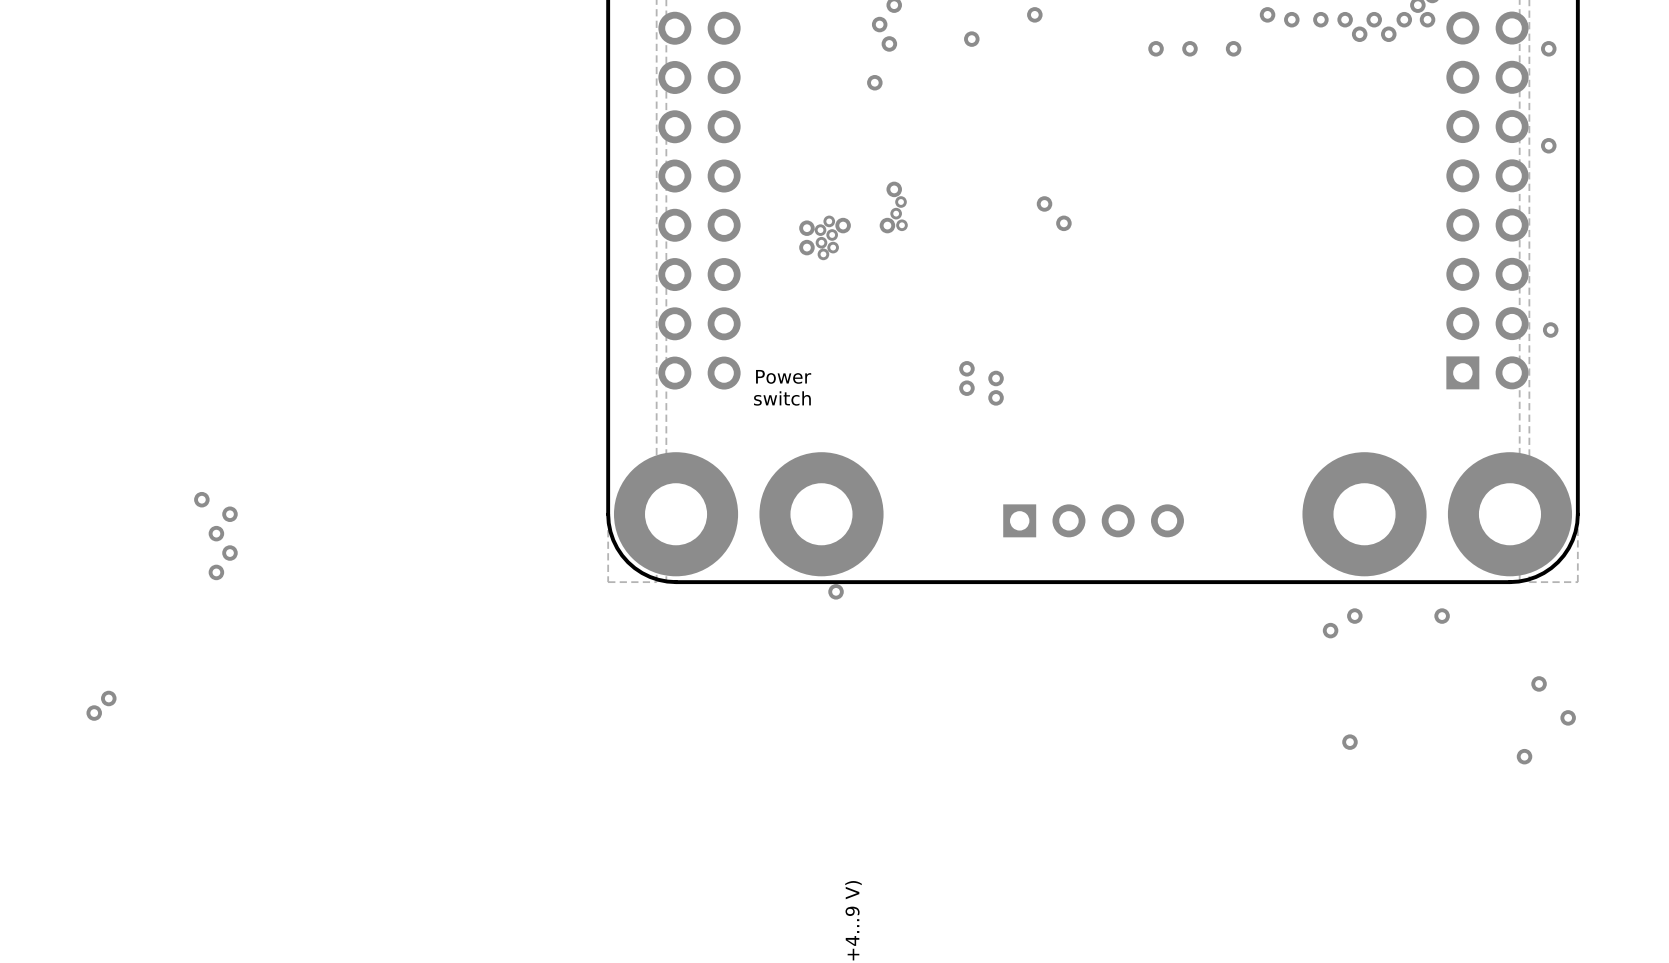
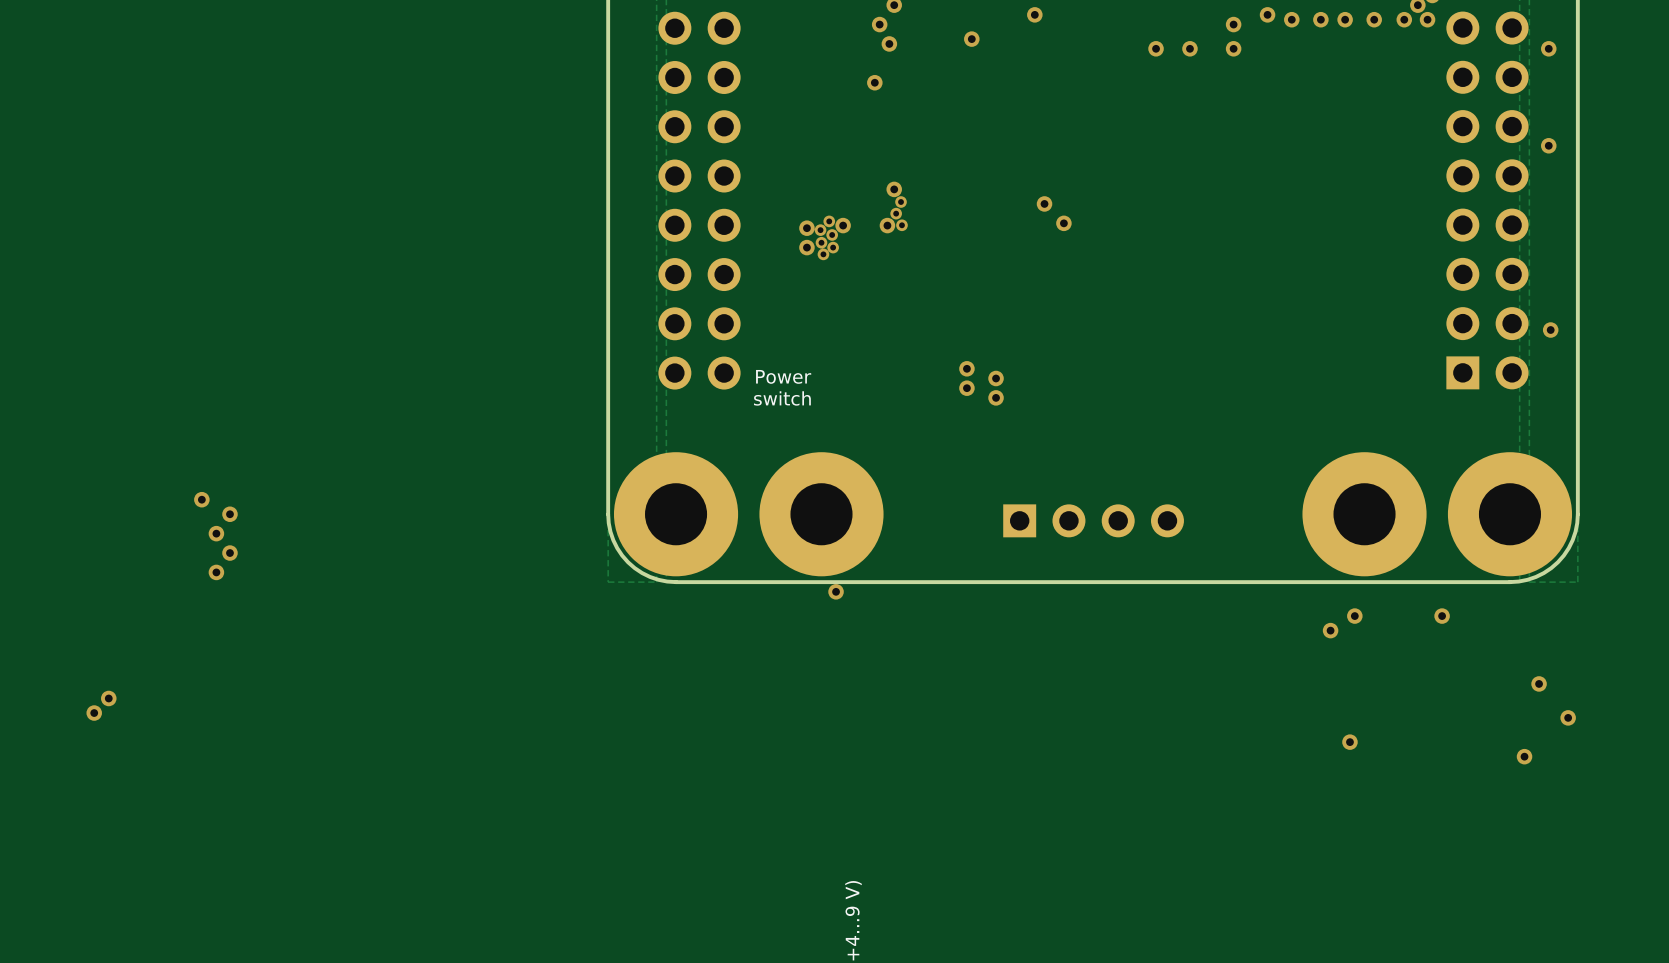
via: none -> (1233, 24)
via: (1359, 34) -> none
via: (1388, 34) -> none

